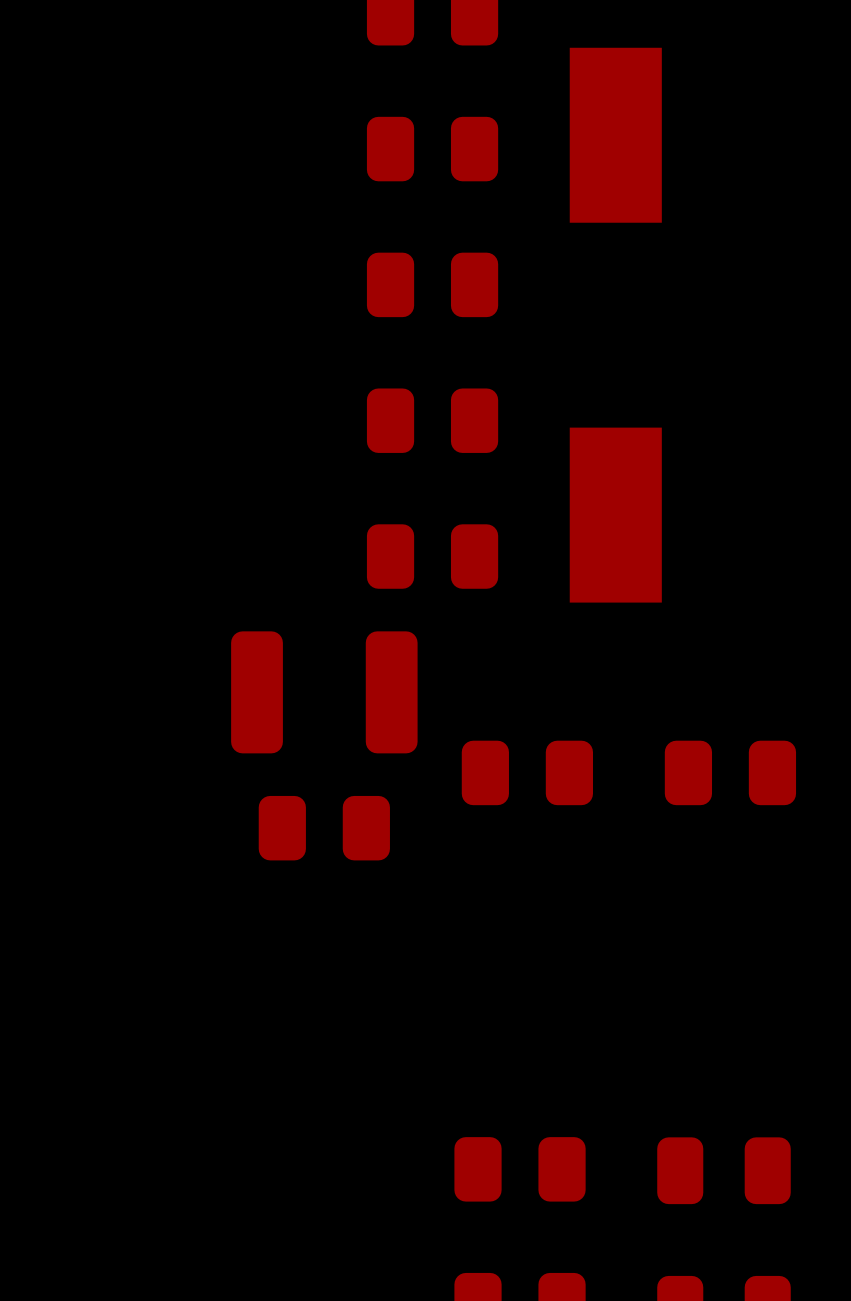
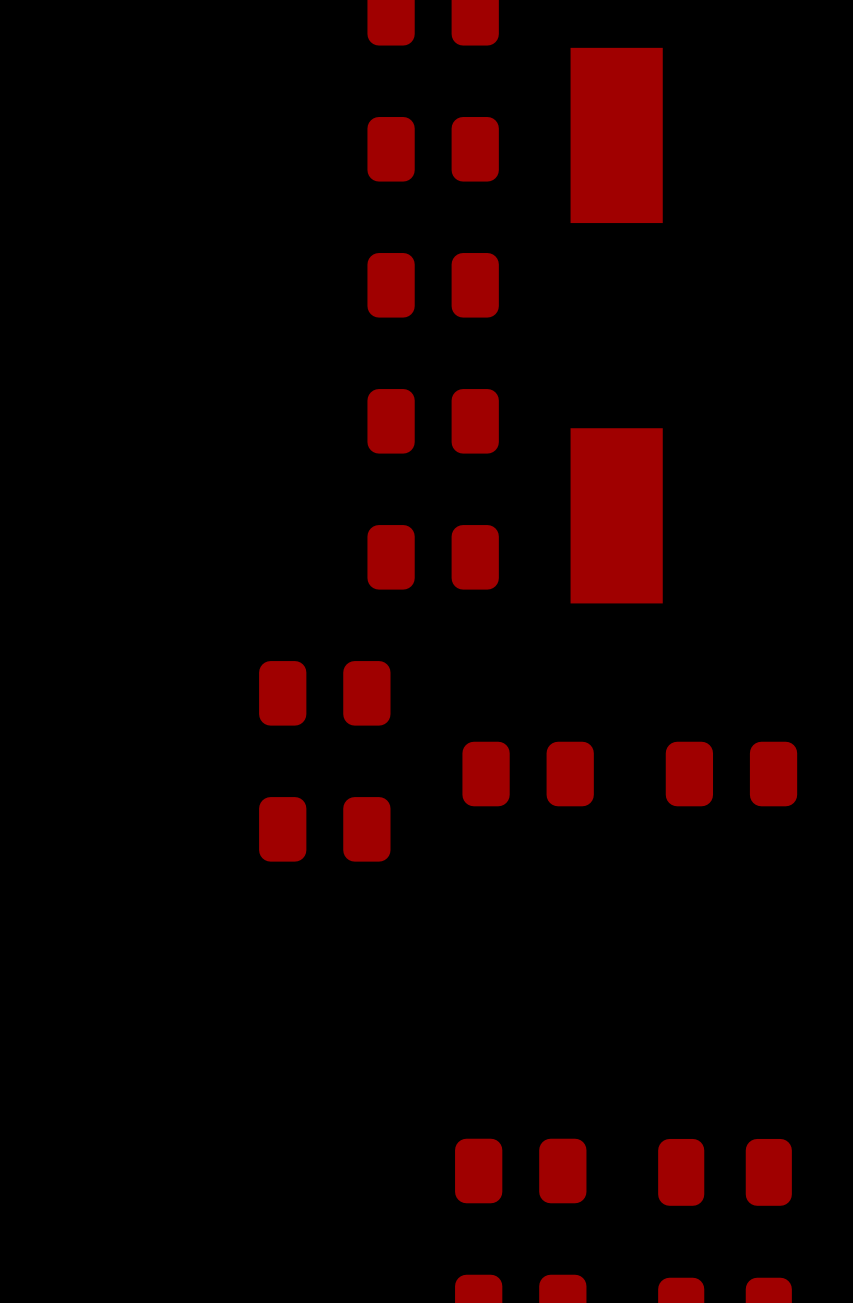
part footprint: [231, 631, 418, 754] -> [259, 661, 391, 726]

